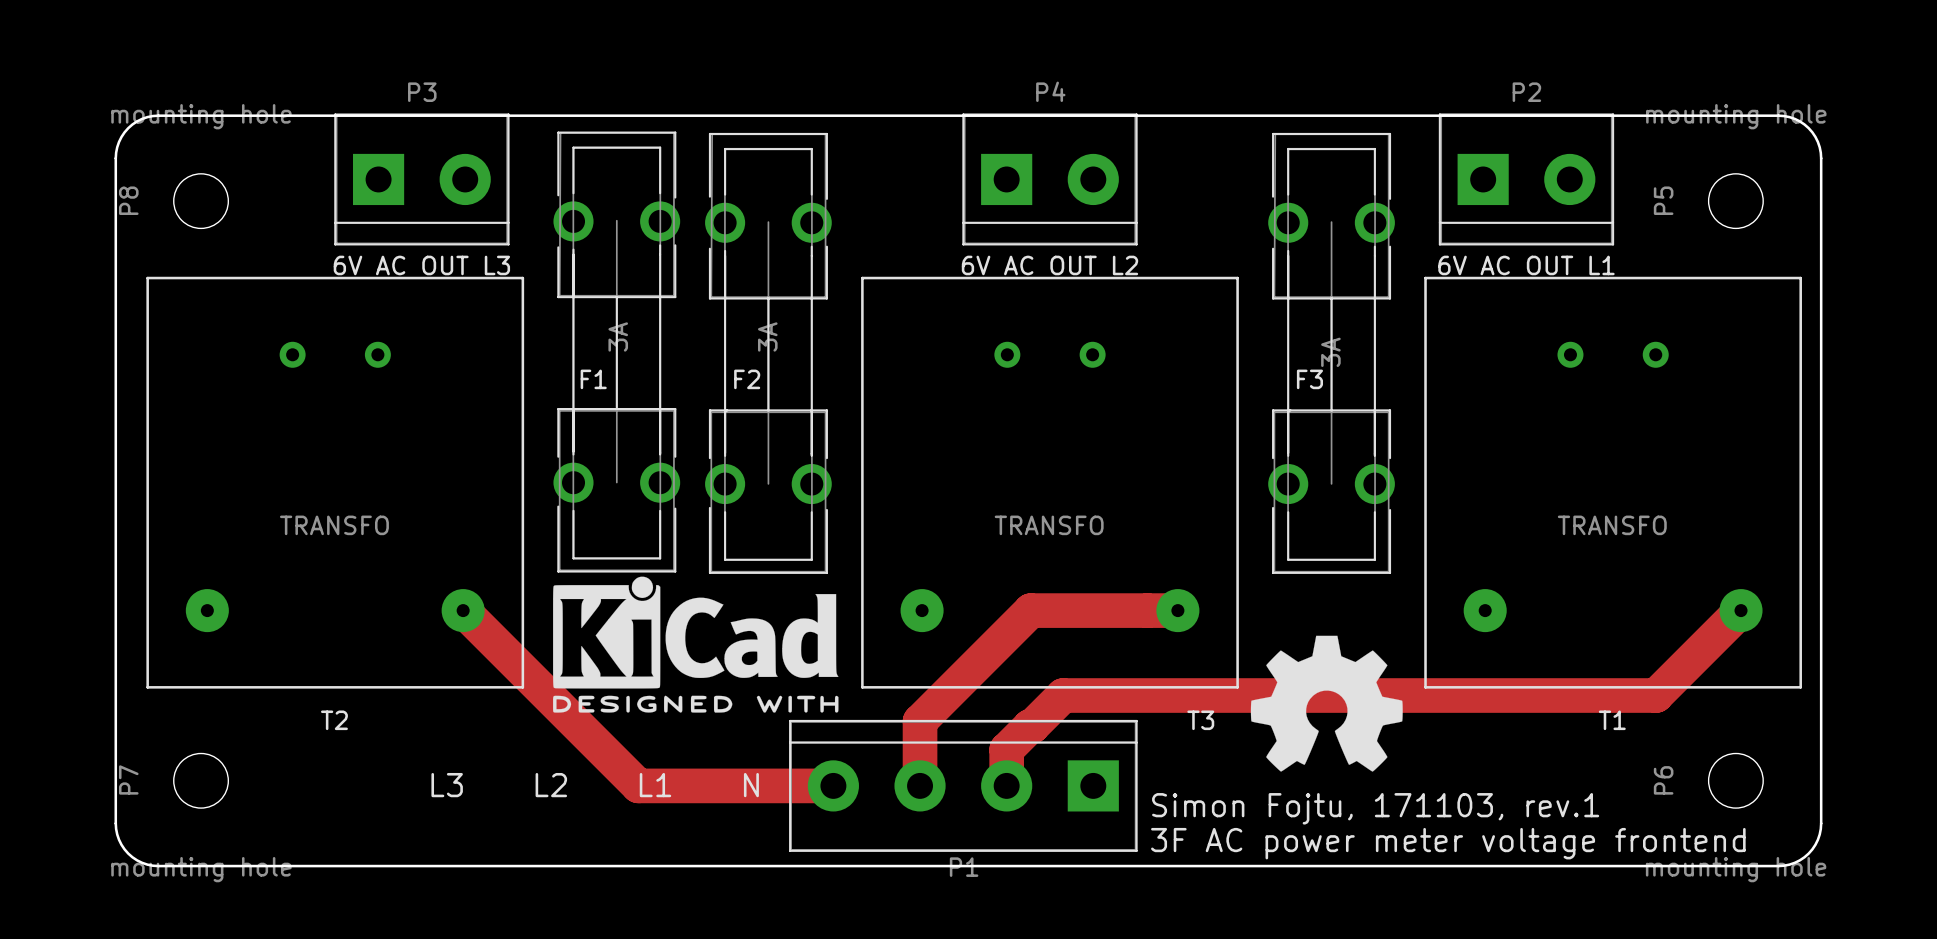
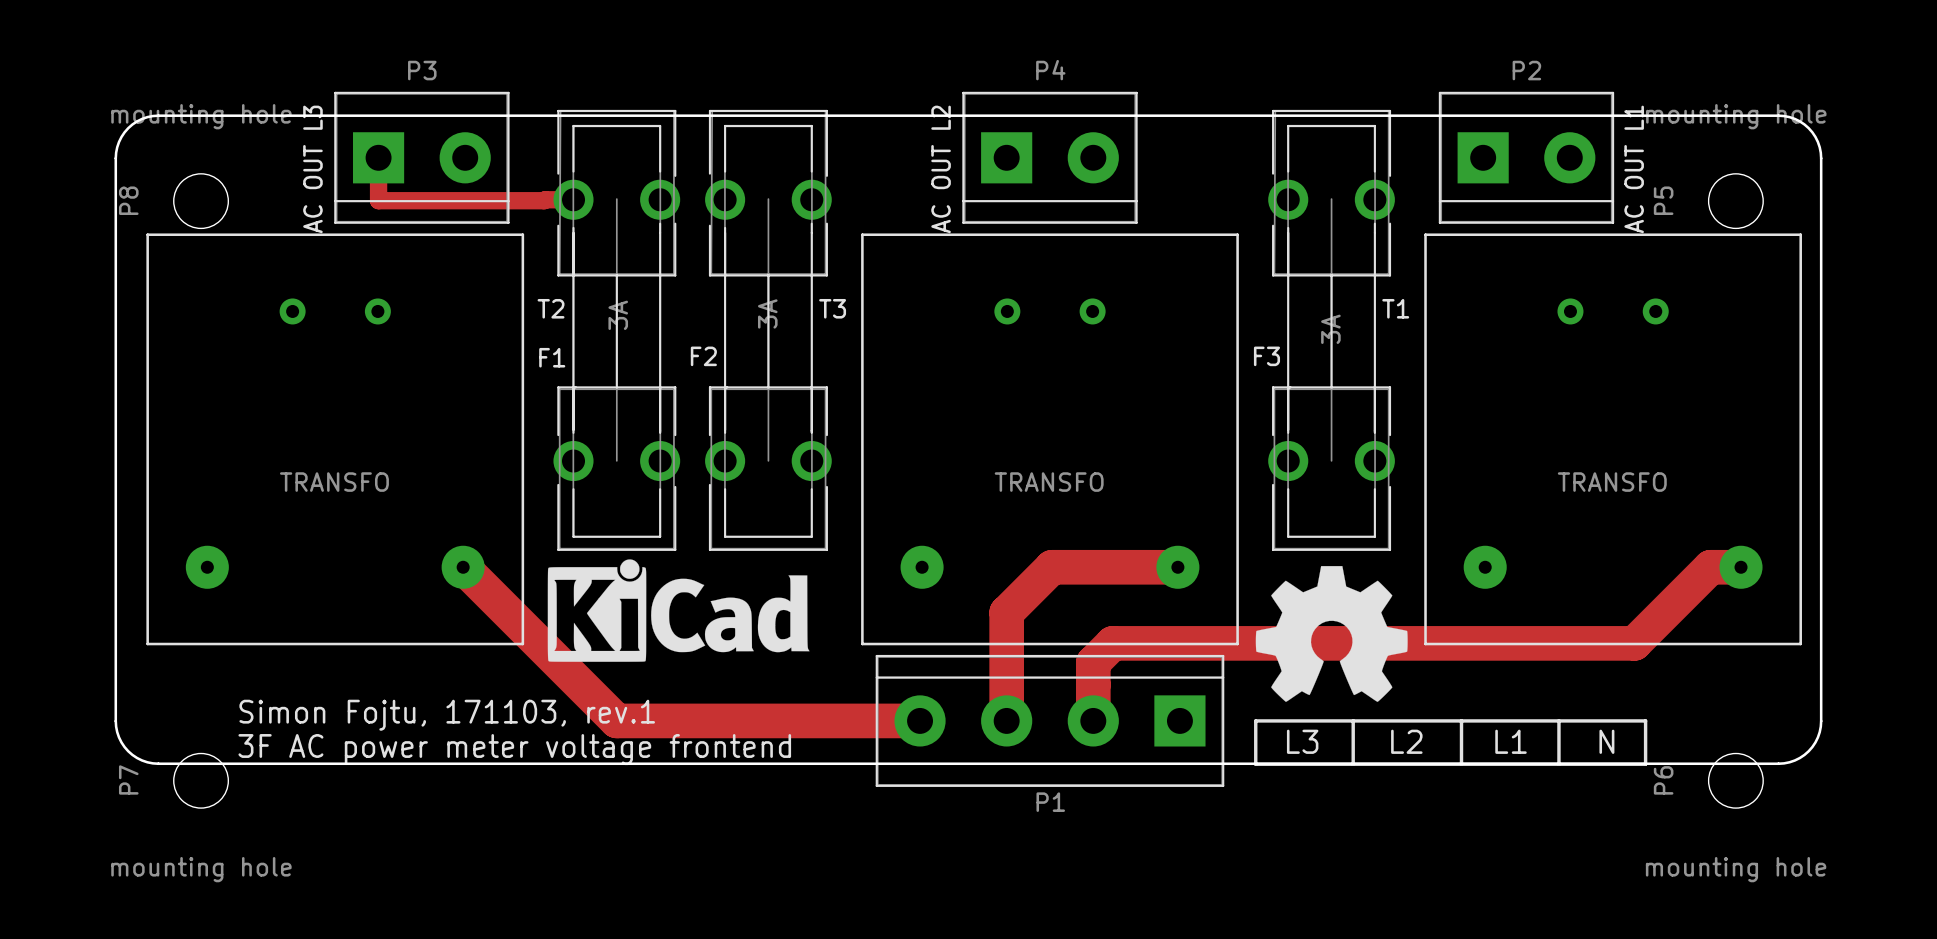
track: none -> (378, 157) (378, 200) (573, 199)
P3 position: (421, 179) -> (421, 157)
P4 position: (1049, 179) -> (1049, 157)
P2 position: (1526, 179) -> (1526, 157)
P3 value: 6V AC OUT L3 (421, 265) -> AC OUT L3 (312, 169)
P4 value: 6V AC OUT L2 (1049, 265) -> AC OUT L2 (941, 169)
P2 value: 6V AC OUT L1 (1526, 265) -> AC OUT L1 (1634, 169)
F1 position: (616, 352) -> (616, 330)
F2 position: (768, 353) -> (768, 330)
F3 position: (1331, 353) -> (1331, 330)
F1 name position: F1 (593, 379) -> F1 (552, 357)
F2 name position: F2 (747, 379) -> F2 (703, 356)
F3 name position: F3 (1309, 379) -> F3 (1266, 356)
T2 position: (335, 482) -> (335, 439)
T3 position: (1049, 482) -> (1049, 439)
T1 position: (1613, 482) -> (1613, 439)
drawing: none -> [547, 559, 810, 662]
track: none -> (463, 567) (616, 720) (920, 720)
track: none -> (1177, 567) (1052, 567) (1006, 612) (1006, 720)
track: none -> (1741, 567) (1710, 567) (1634, 643) (1112, 643) (1093, 662) (1093, 720)
drawing: [553, 576, 839, 713] -> none
track: (463, 610) (638, 785) (833, 785) -> none
track: (1177, 610) (1030, 610) (920, 721) (920, 785) -> none
track: (1741, 610) (1656, 695) (1063, 695) (1006, 749) (1006, 785) -> none
drawing position: (1326, 703) -> (1331, 633)
text: none -> Simon Fojtu, 171103, rev.1 (447, 715)
T2 name position: T2 (334, 720) -> T2 (551, 308)
T3 name position: T3 (1200, 720) -> T3 (832, 308)
line: none -> (1255, 720) (1255, 764) (1645, 764) (1645, 720) (1255, 720)
line: none -> (1353, 720) (1353, 764)
line: none -> (1461, 720) (1461, 764)
line: none -> (1558, 720) (1558, 764)
T1 name position: T1 (1612, 720) -> T1 (1395, 308)
board edge: (115, 721) (117, 834) (124, 849) (132, 857) (147, 864) (158, 866) (1784, 865) (1794, 862) (1808, 853) (1819, 834) (1821, 721) -> (115, 721) (119, 737) (128, 751) (142, 760) (158, 763) (1778, 763) (1794, 760) (1808, 751) (1817, 737) (1821, 721)
text: none -> 3F AC power meter voltage frontend (514, 749)
P1 value position: L3 L2 L1 N (595, 785) -> L3 L2 L1 N (1450, 741)
P1 position: (963, 785) -> (1049, 720)
text: Simon Fojtu, 171103, rev.1 (1375, 808) -> none
text: 3F AC power meter voltage frontend (1448, 843) -> none

